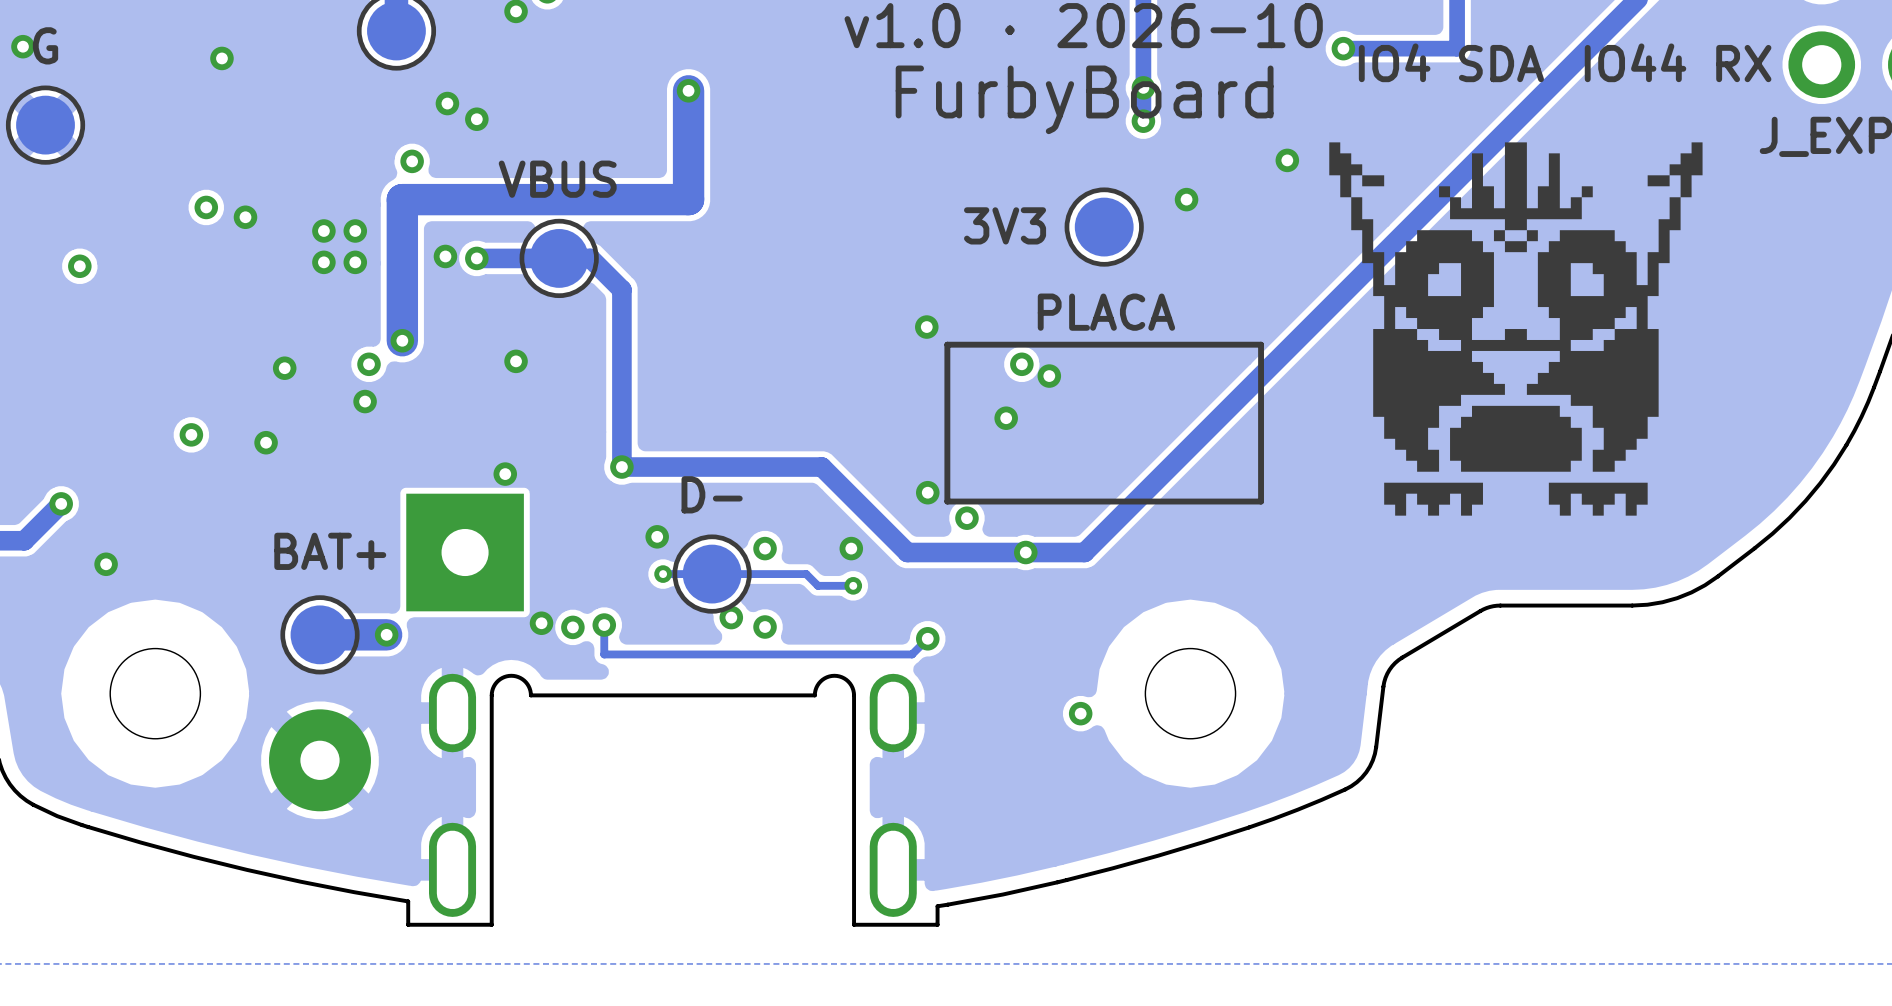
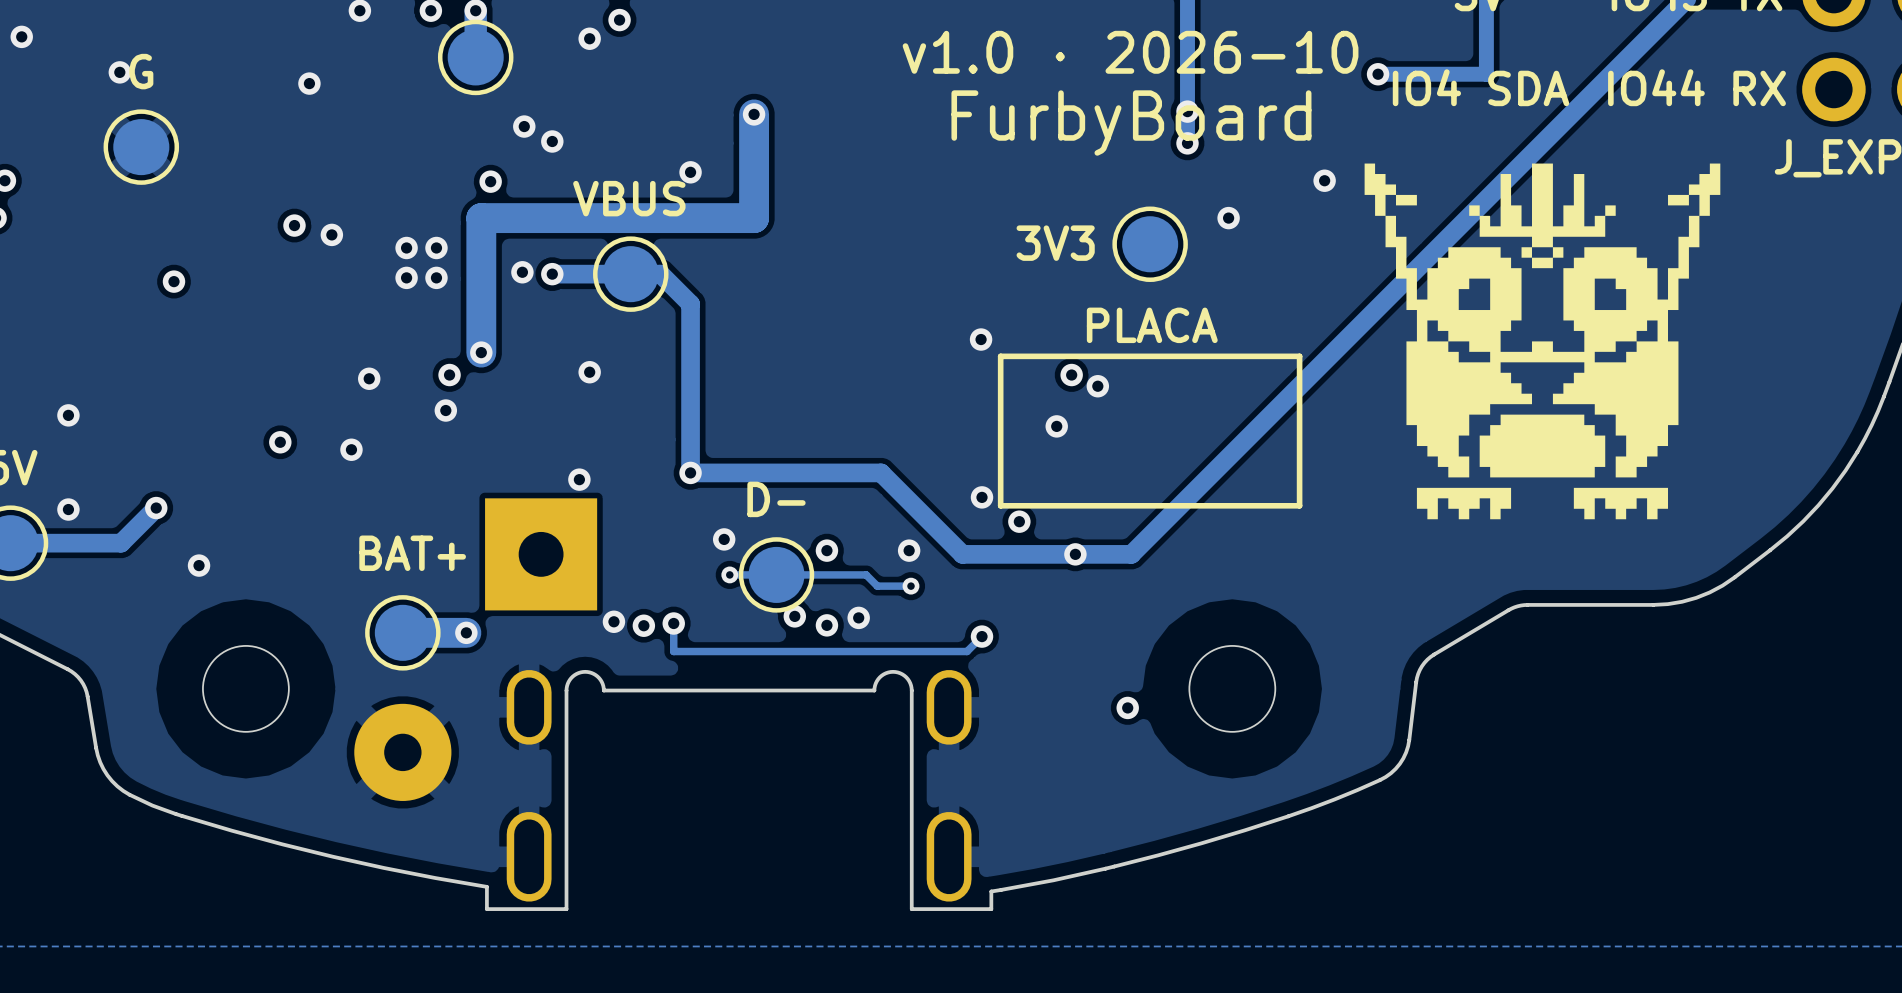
via: none -> (690, 172)
via: none -> (858, 617)

